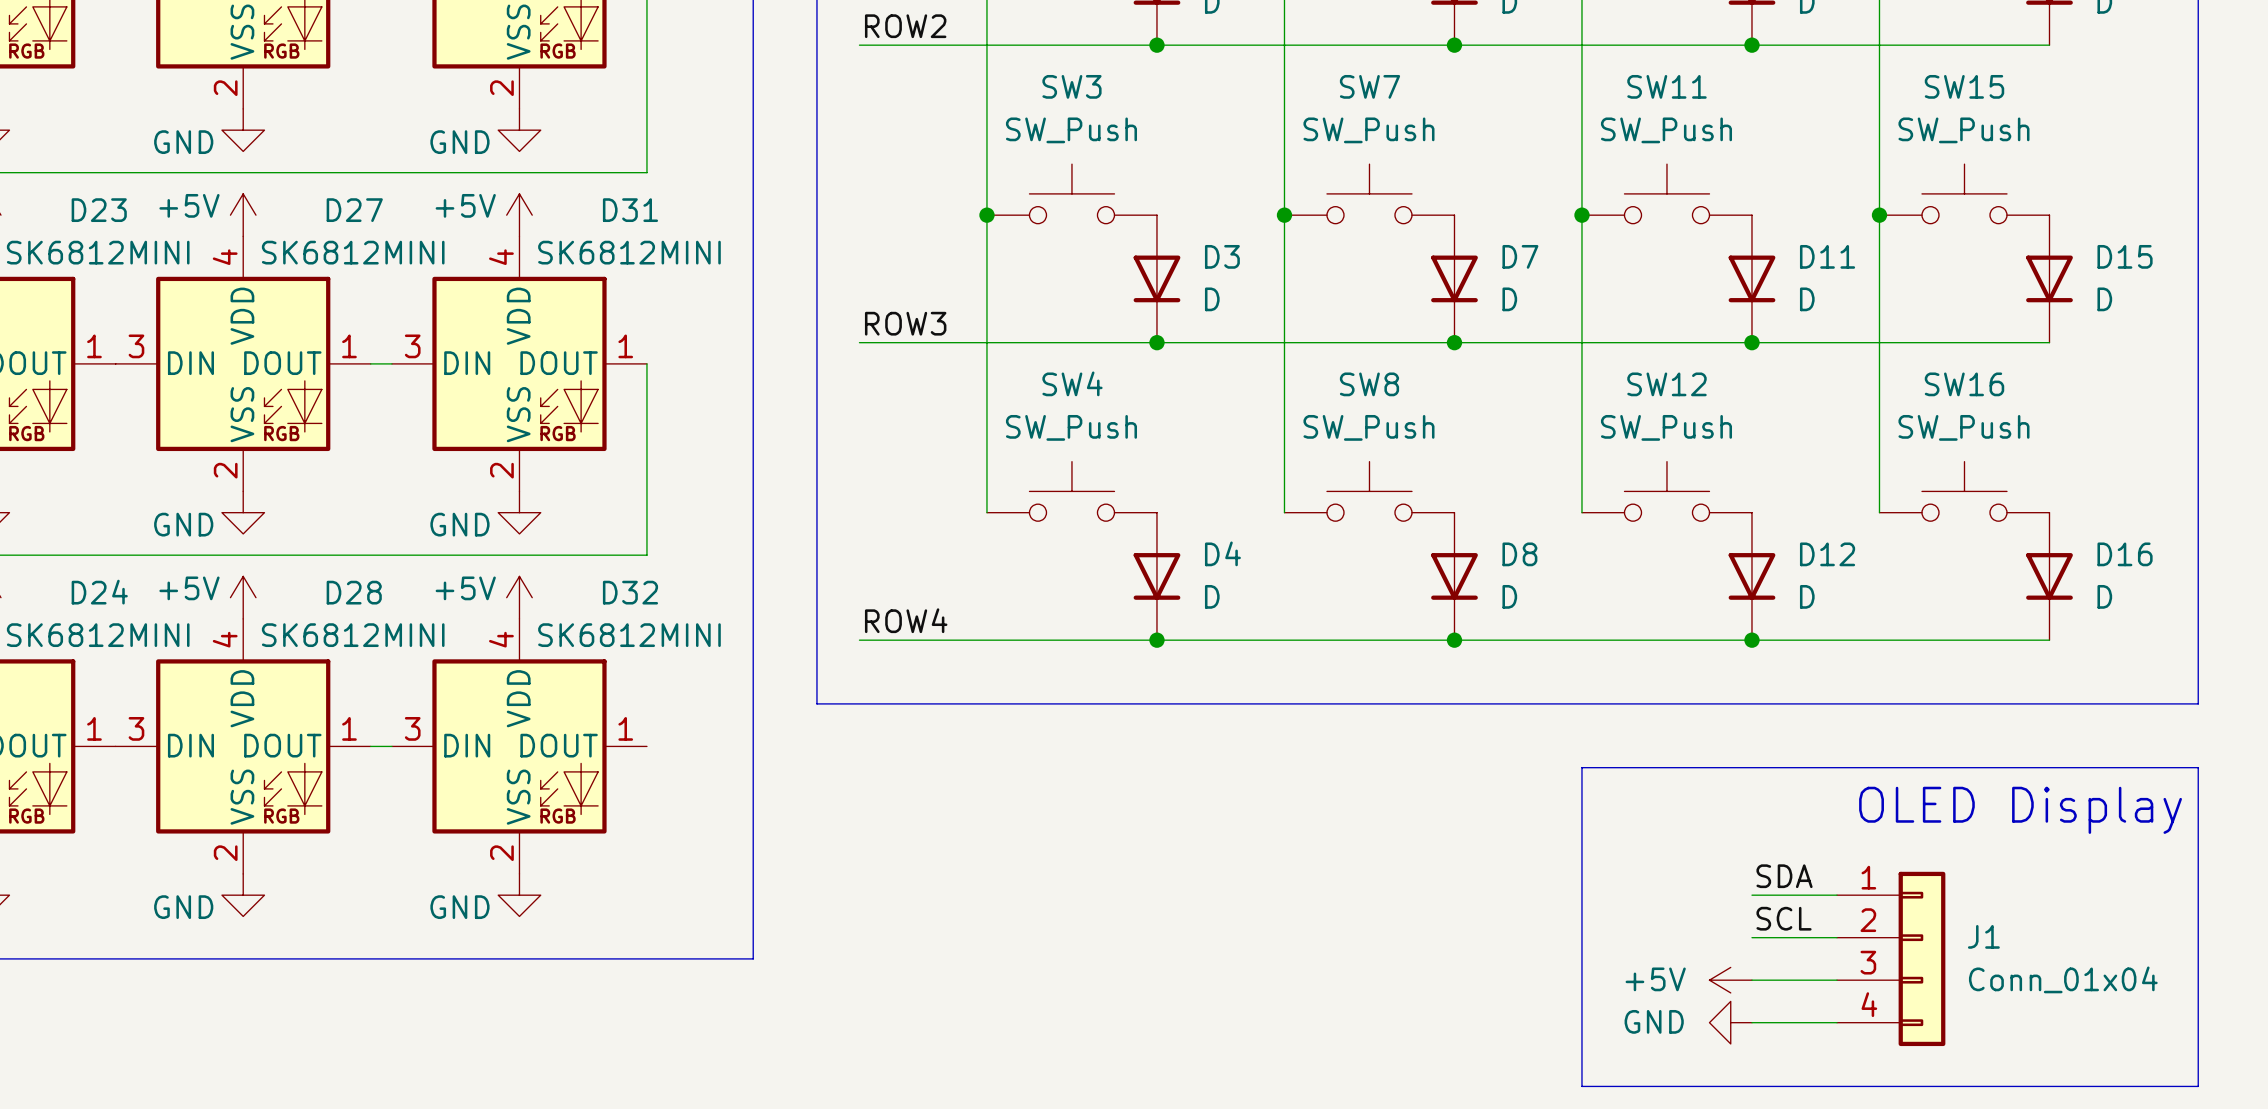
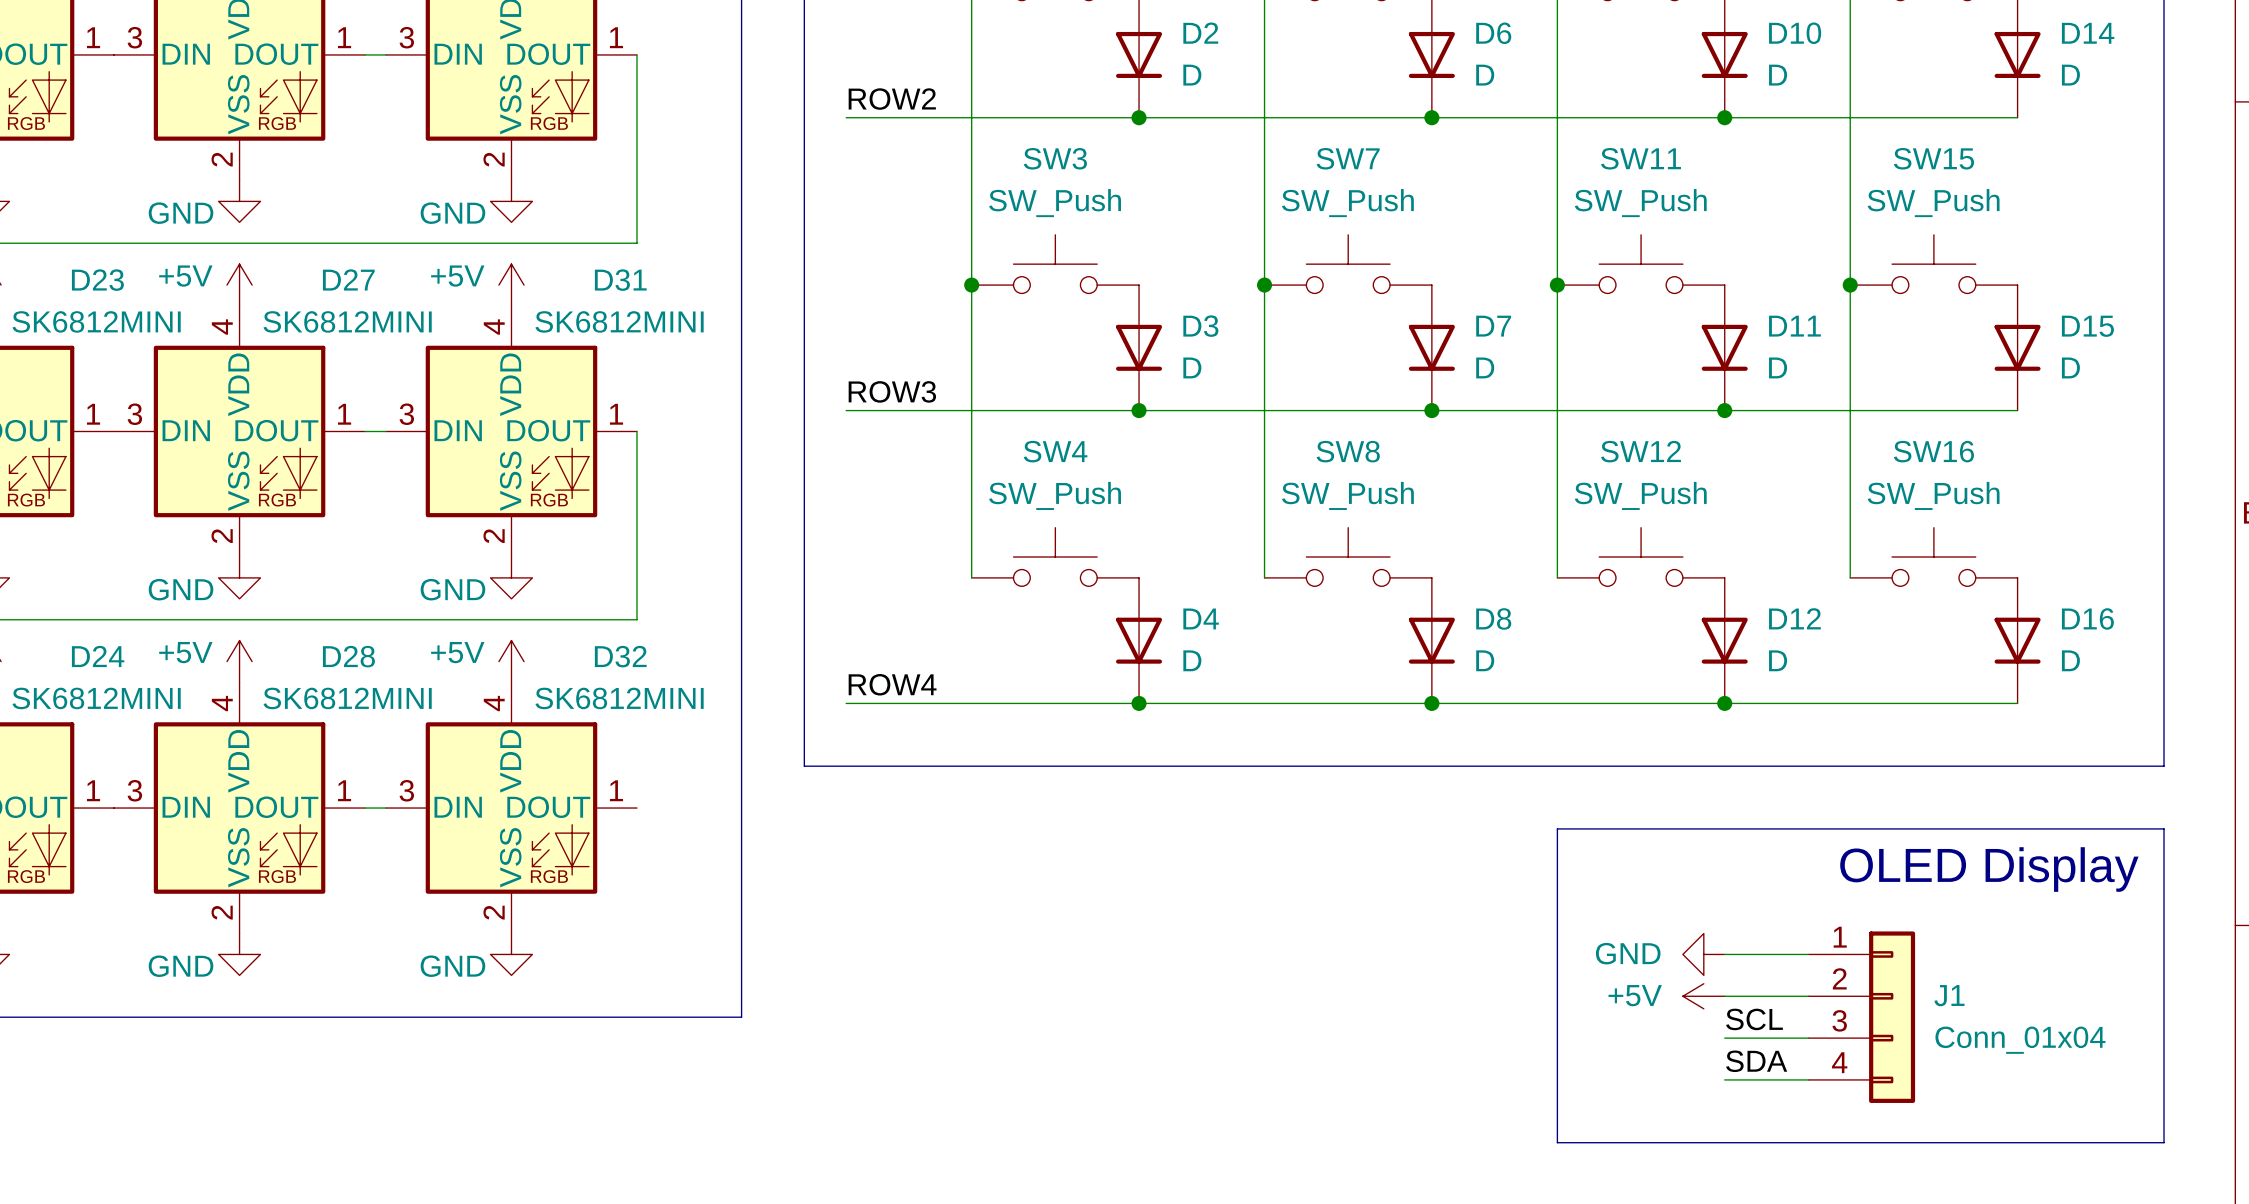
label position: SDA (1784, 876) -> SDA (1756, 1061)
label position: SCL (1784, 918) -> SCL (1754, 1019)
power symbol position: +5V (1730, 980) -> +5V (1703, 996)
power symbol position: GND (1730, 1022) -> GND (1703, 954)

